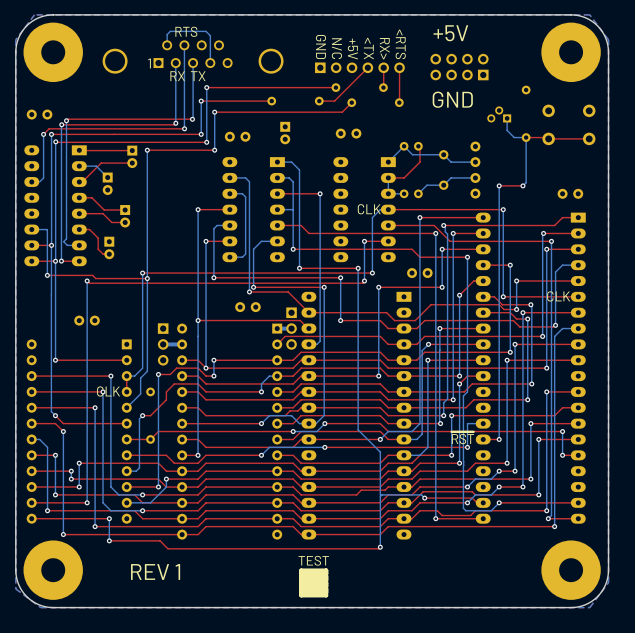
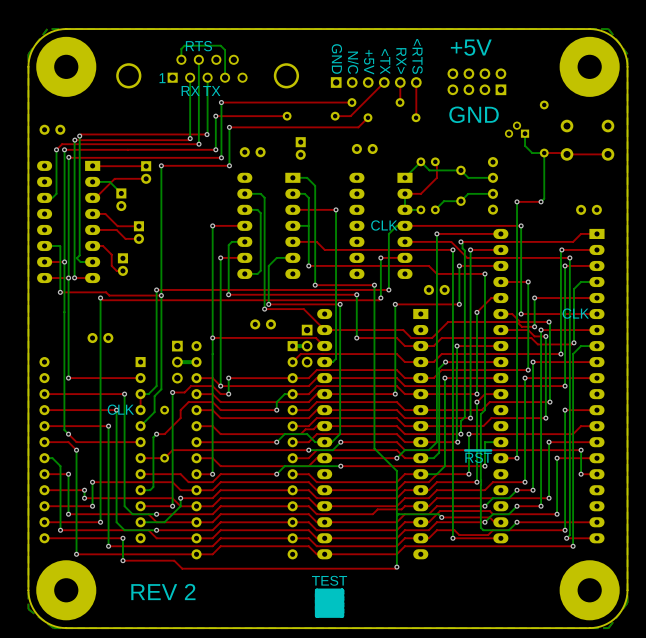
text: REV 1 (155, 571) -> REV 2 (163, 591)

